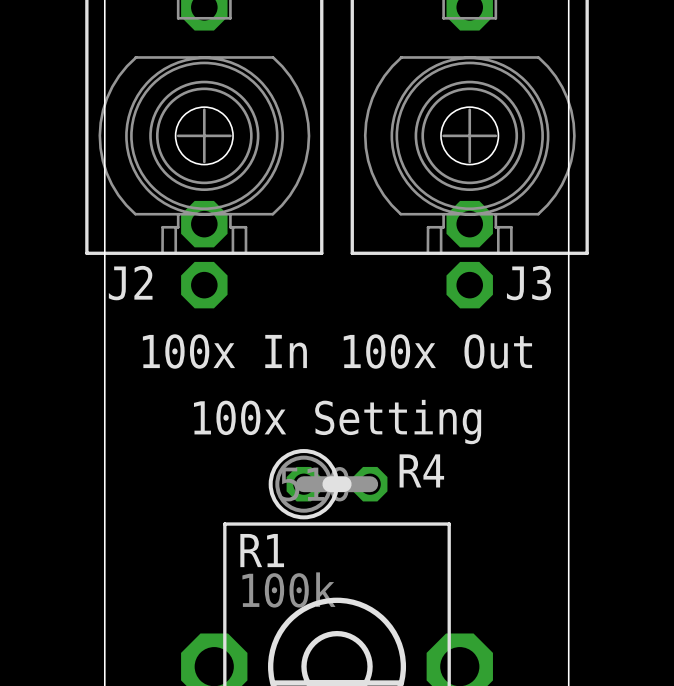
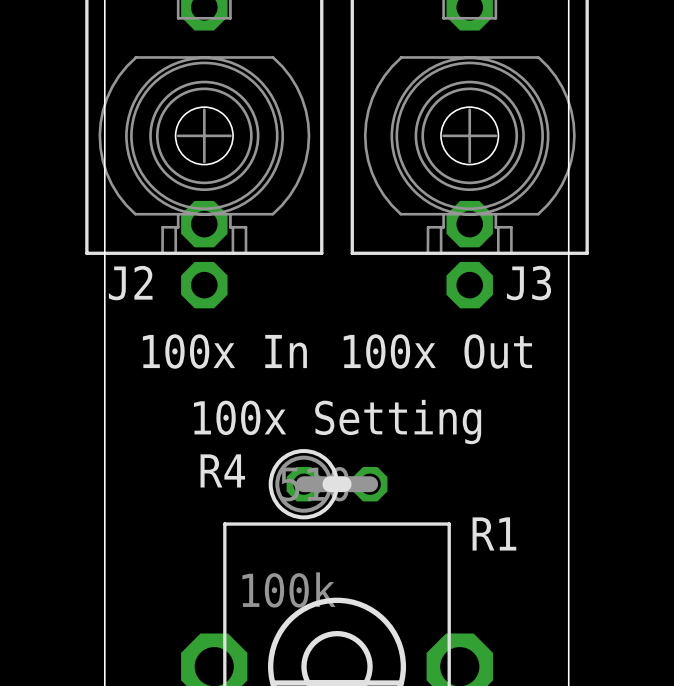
R4 name position: R4 (421, 470) -> R4 (222, 470)
R1 name position: R1 (262, 550) -> R1 (494, 533)

